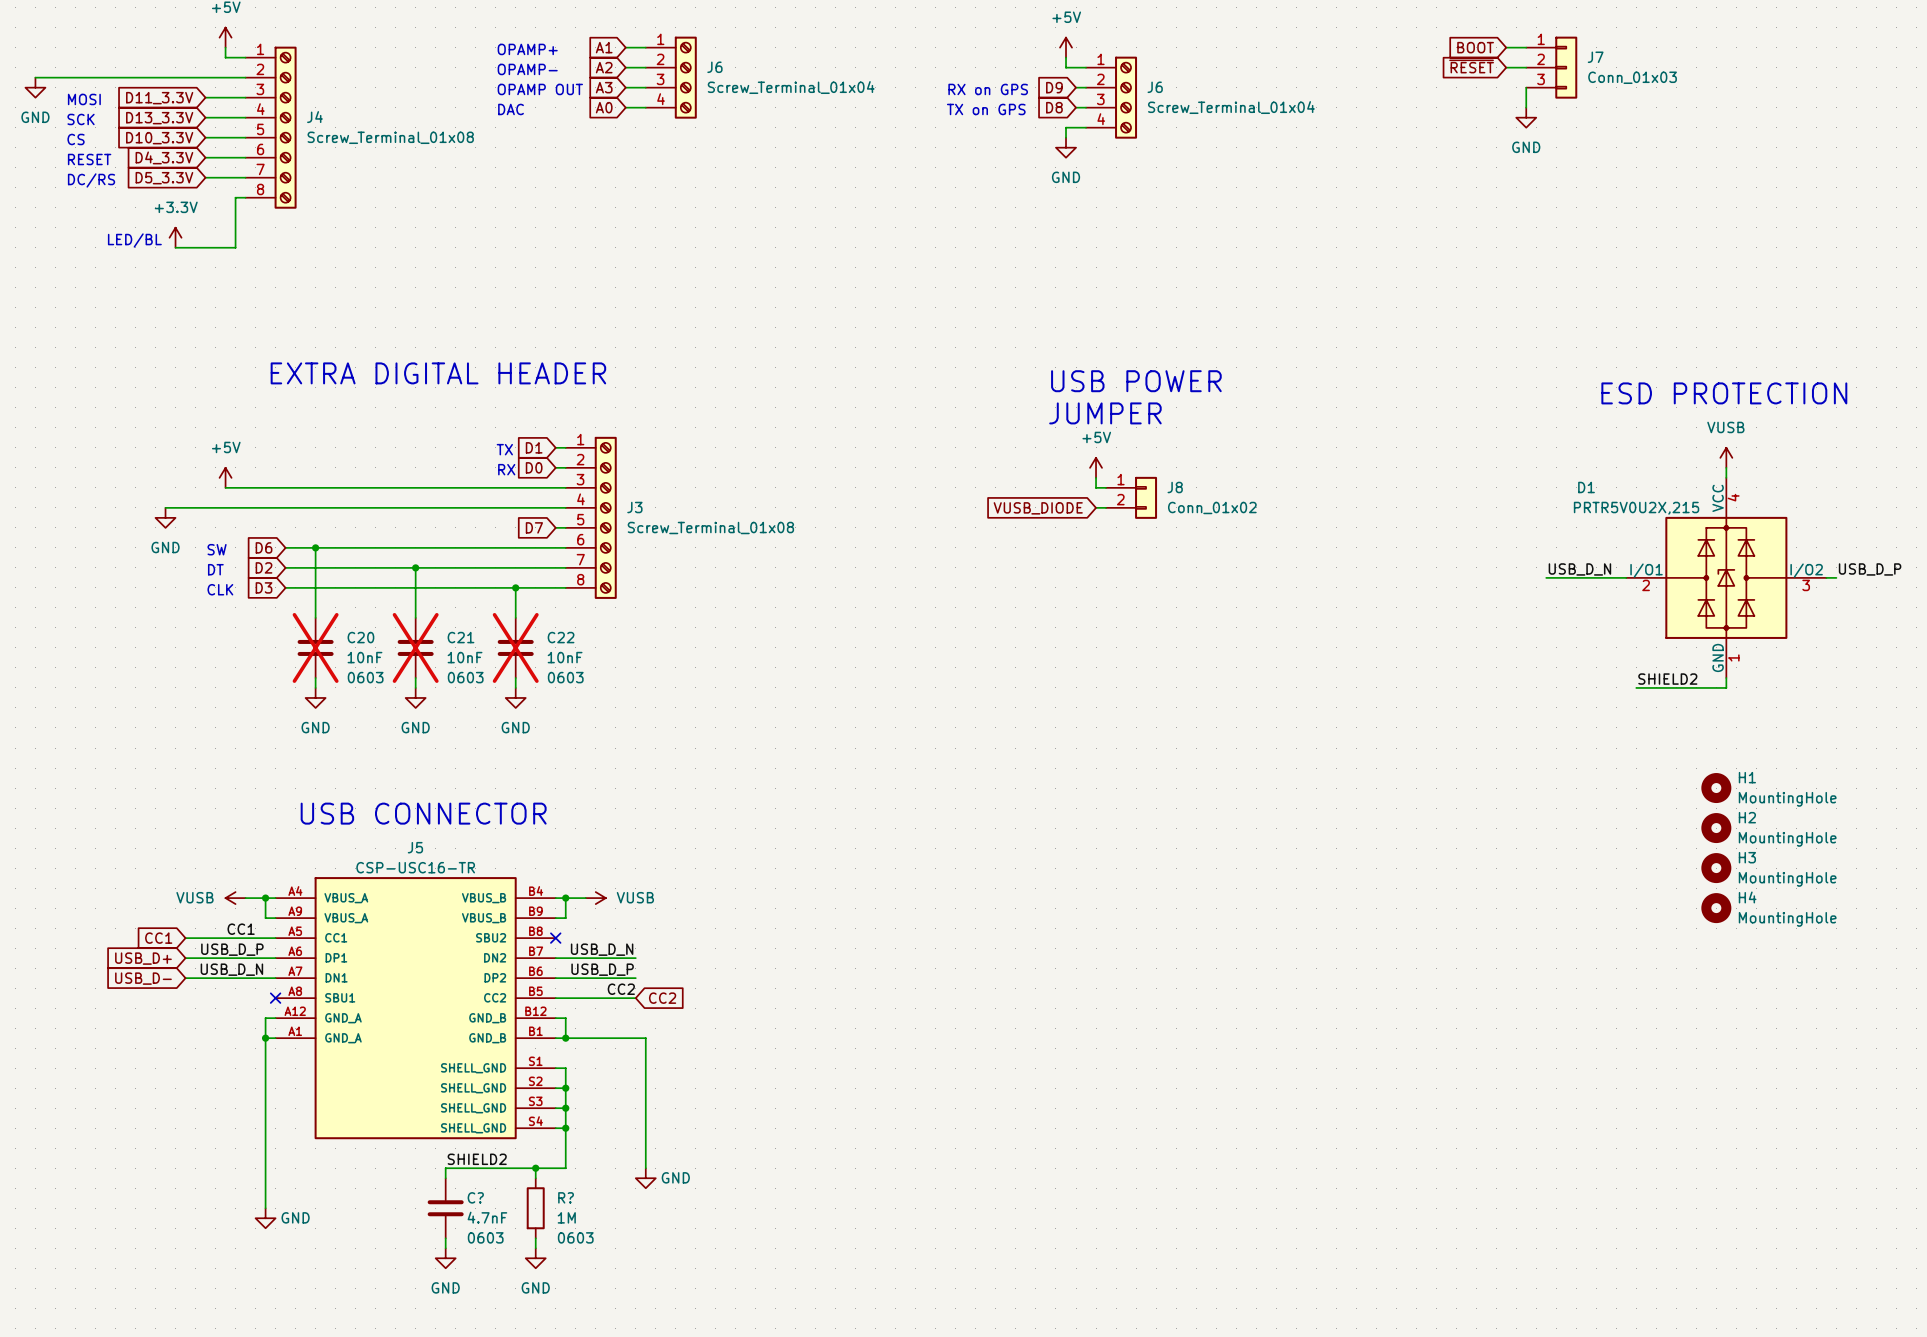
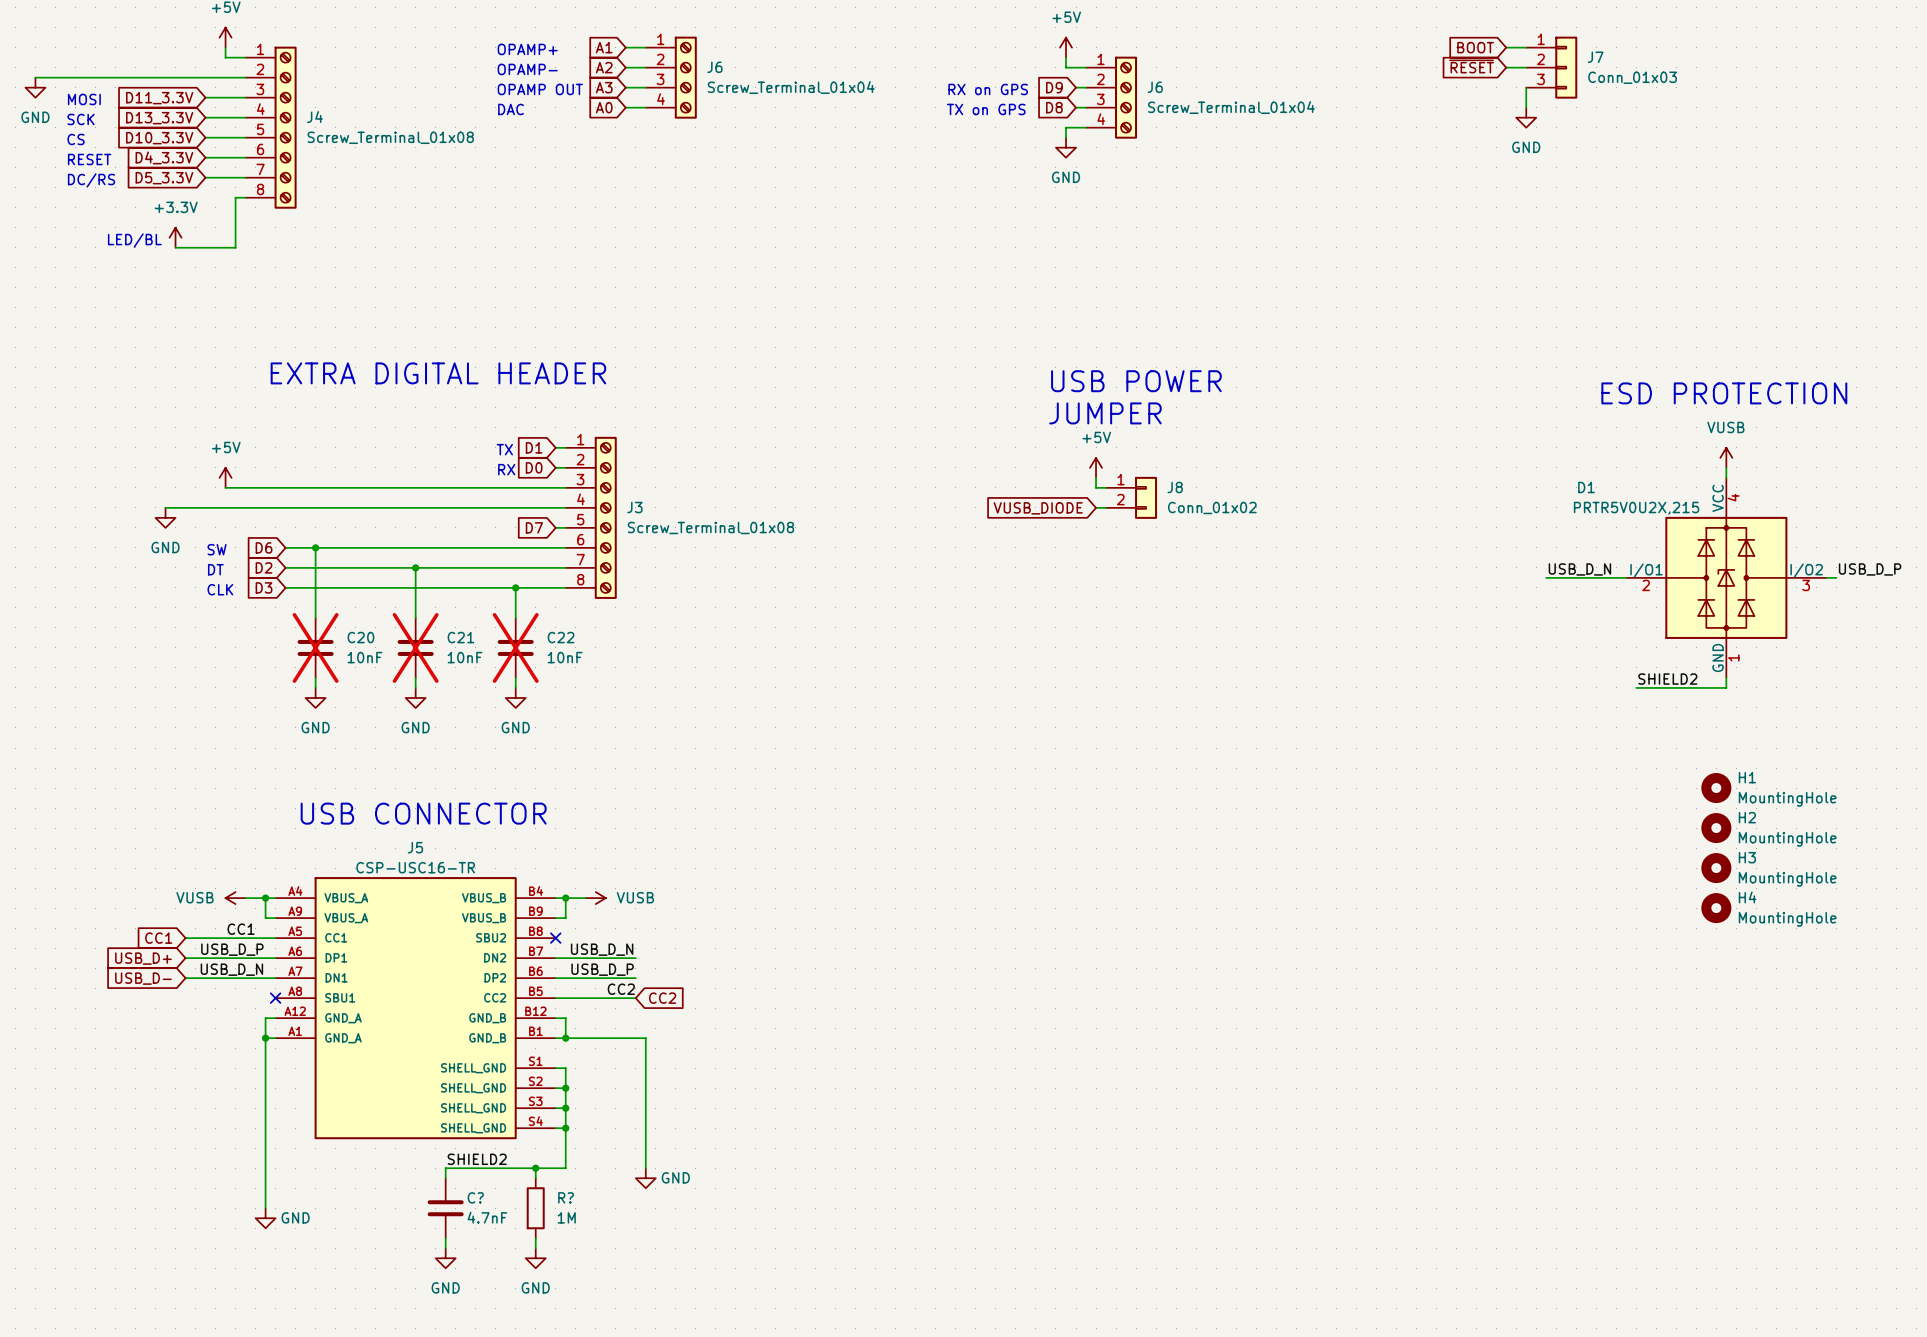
C20 text: 0603 (365, 677) -> none
C21 text: 0603 (465, 677) -> none
C22 text: 0603 (565, 677) -> none
C? text: 0603 (485, 1237) -> none
R? text: 0603 (575, 1237) -> none

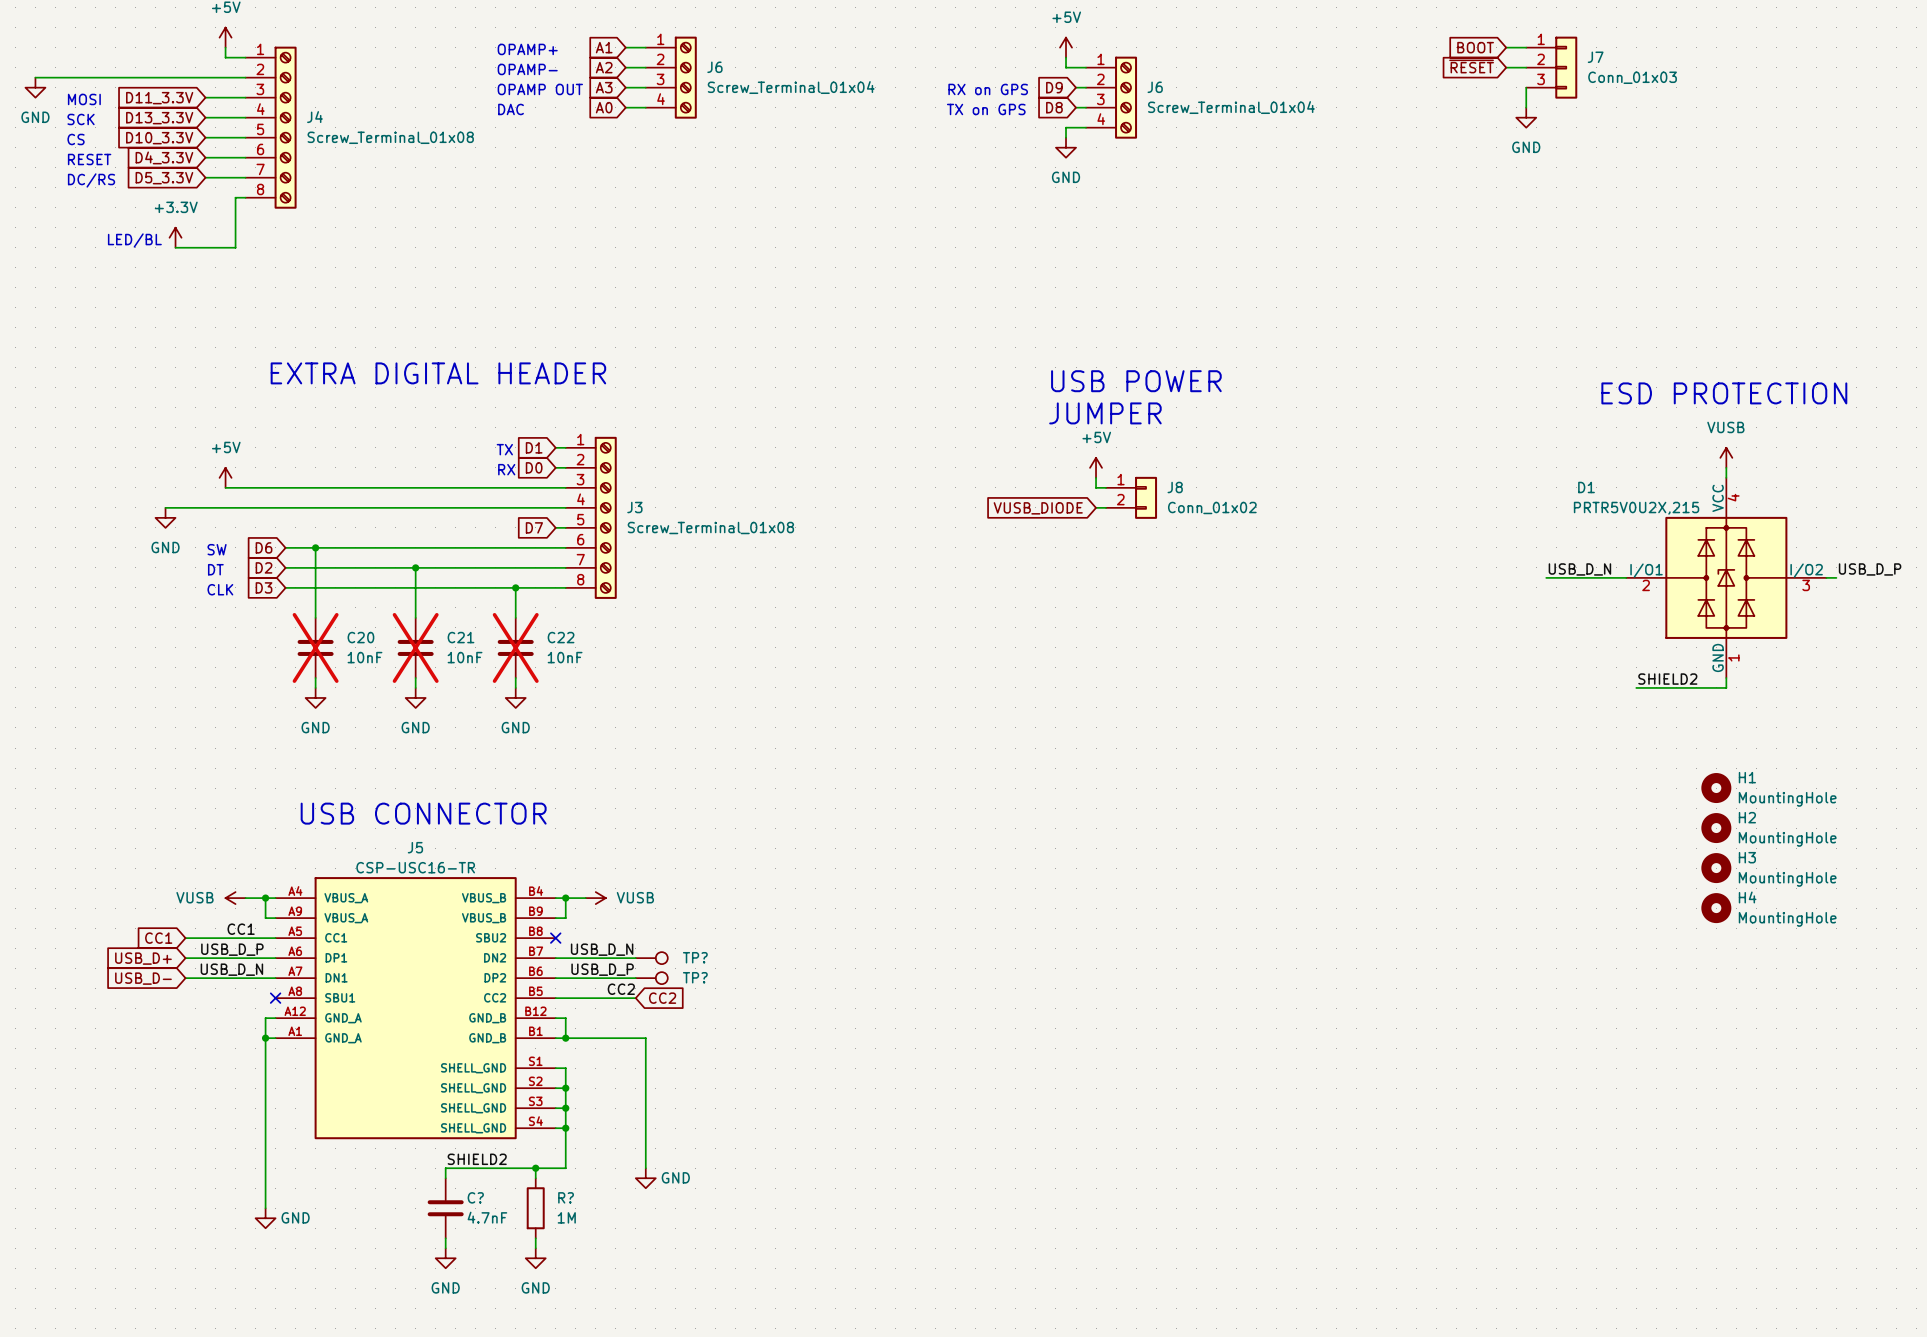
TP?: none -> (651, 958)
TP?: none -> (651, 978)

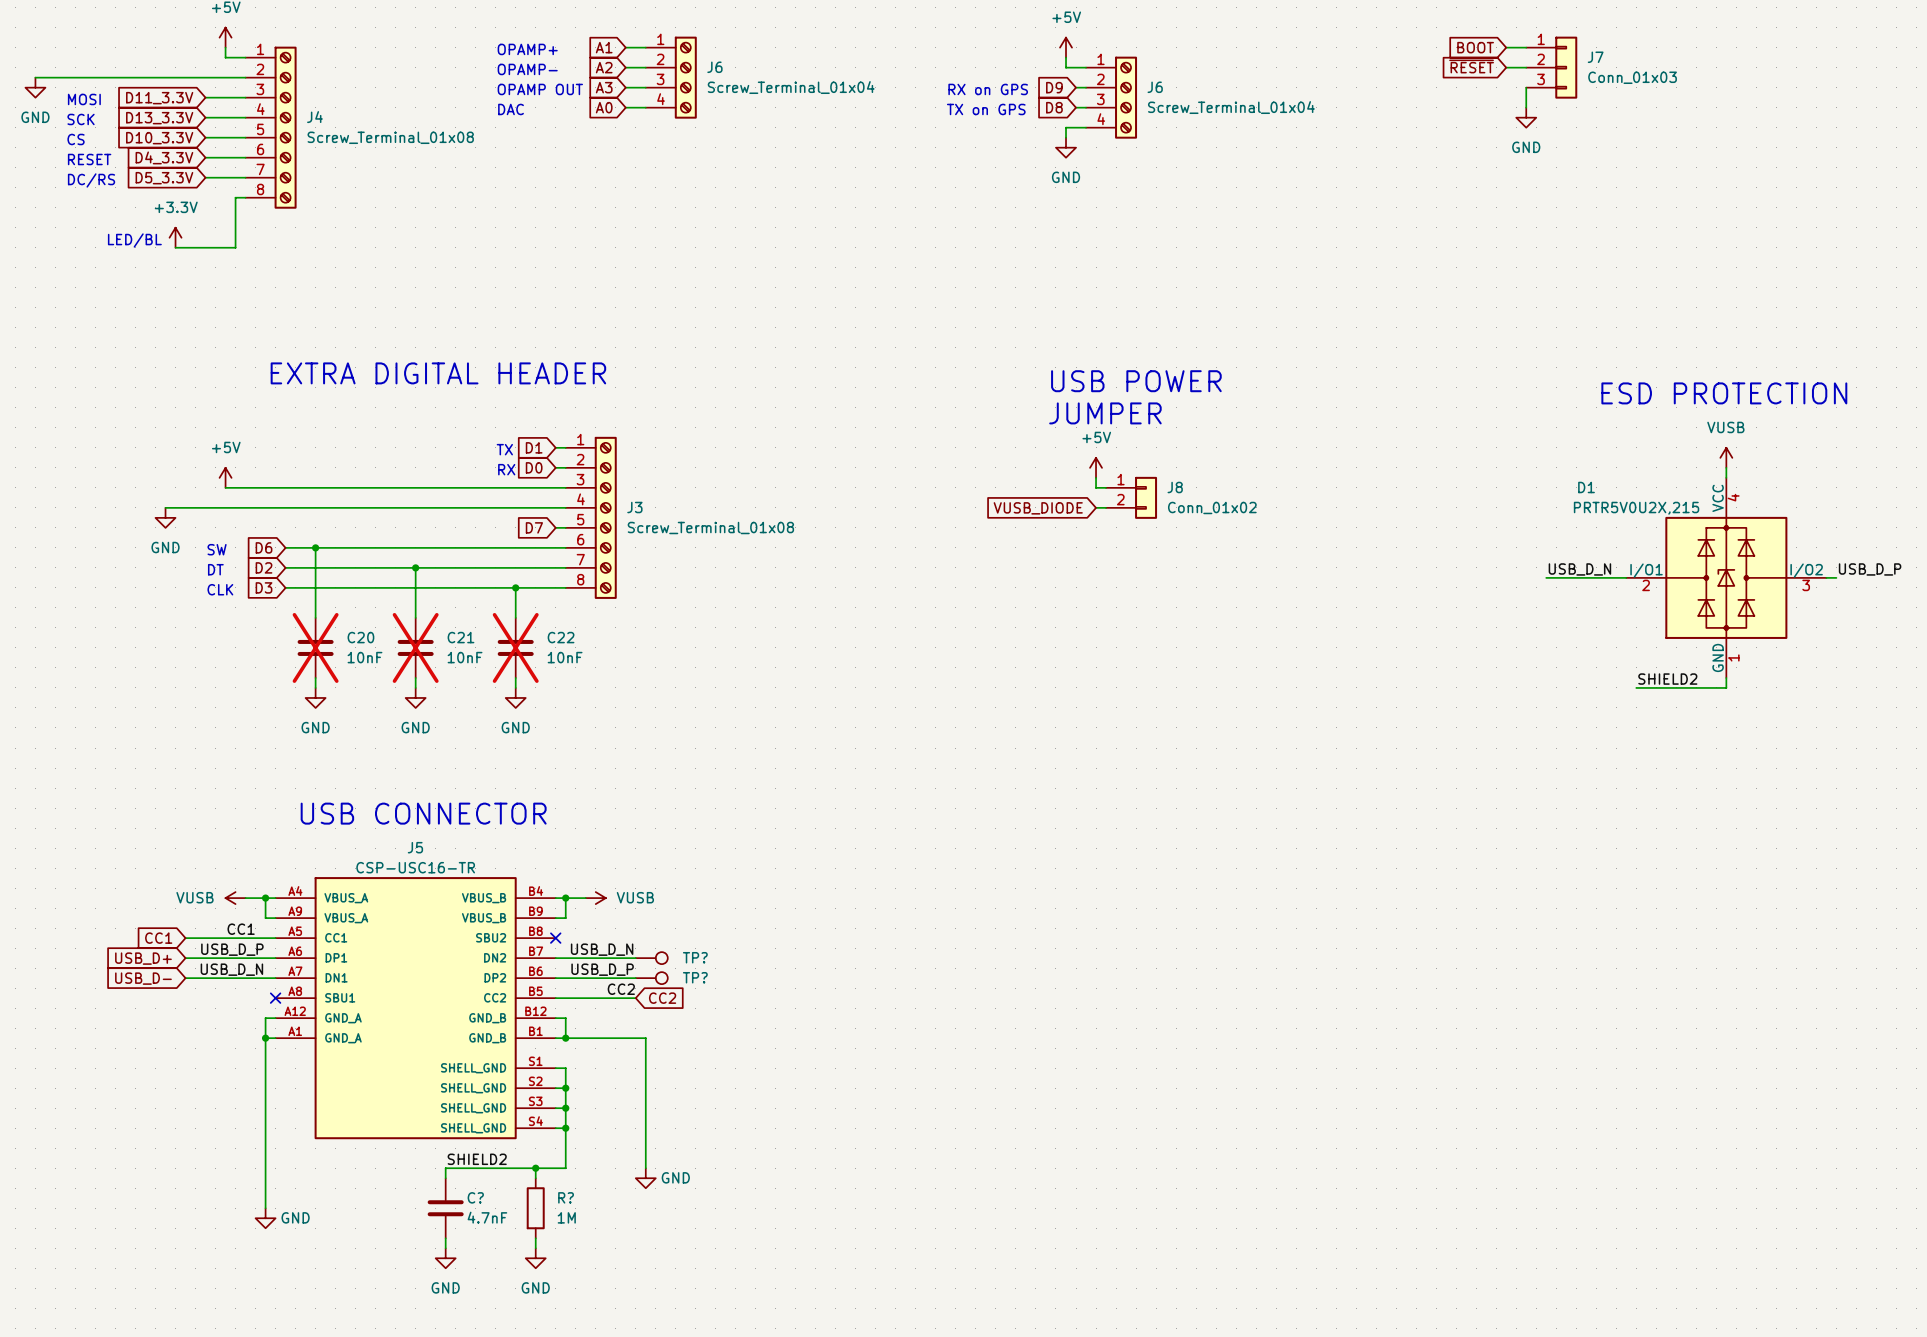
H1: MountingHole (1716, 788) -> none
H2: MountingHole (1716, 828) -> none
H3: MountingHole (1716, 868) -> none
H4: MountingHole (1716, 908) -> none

